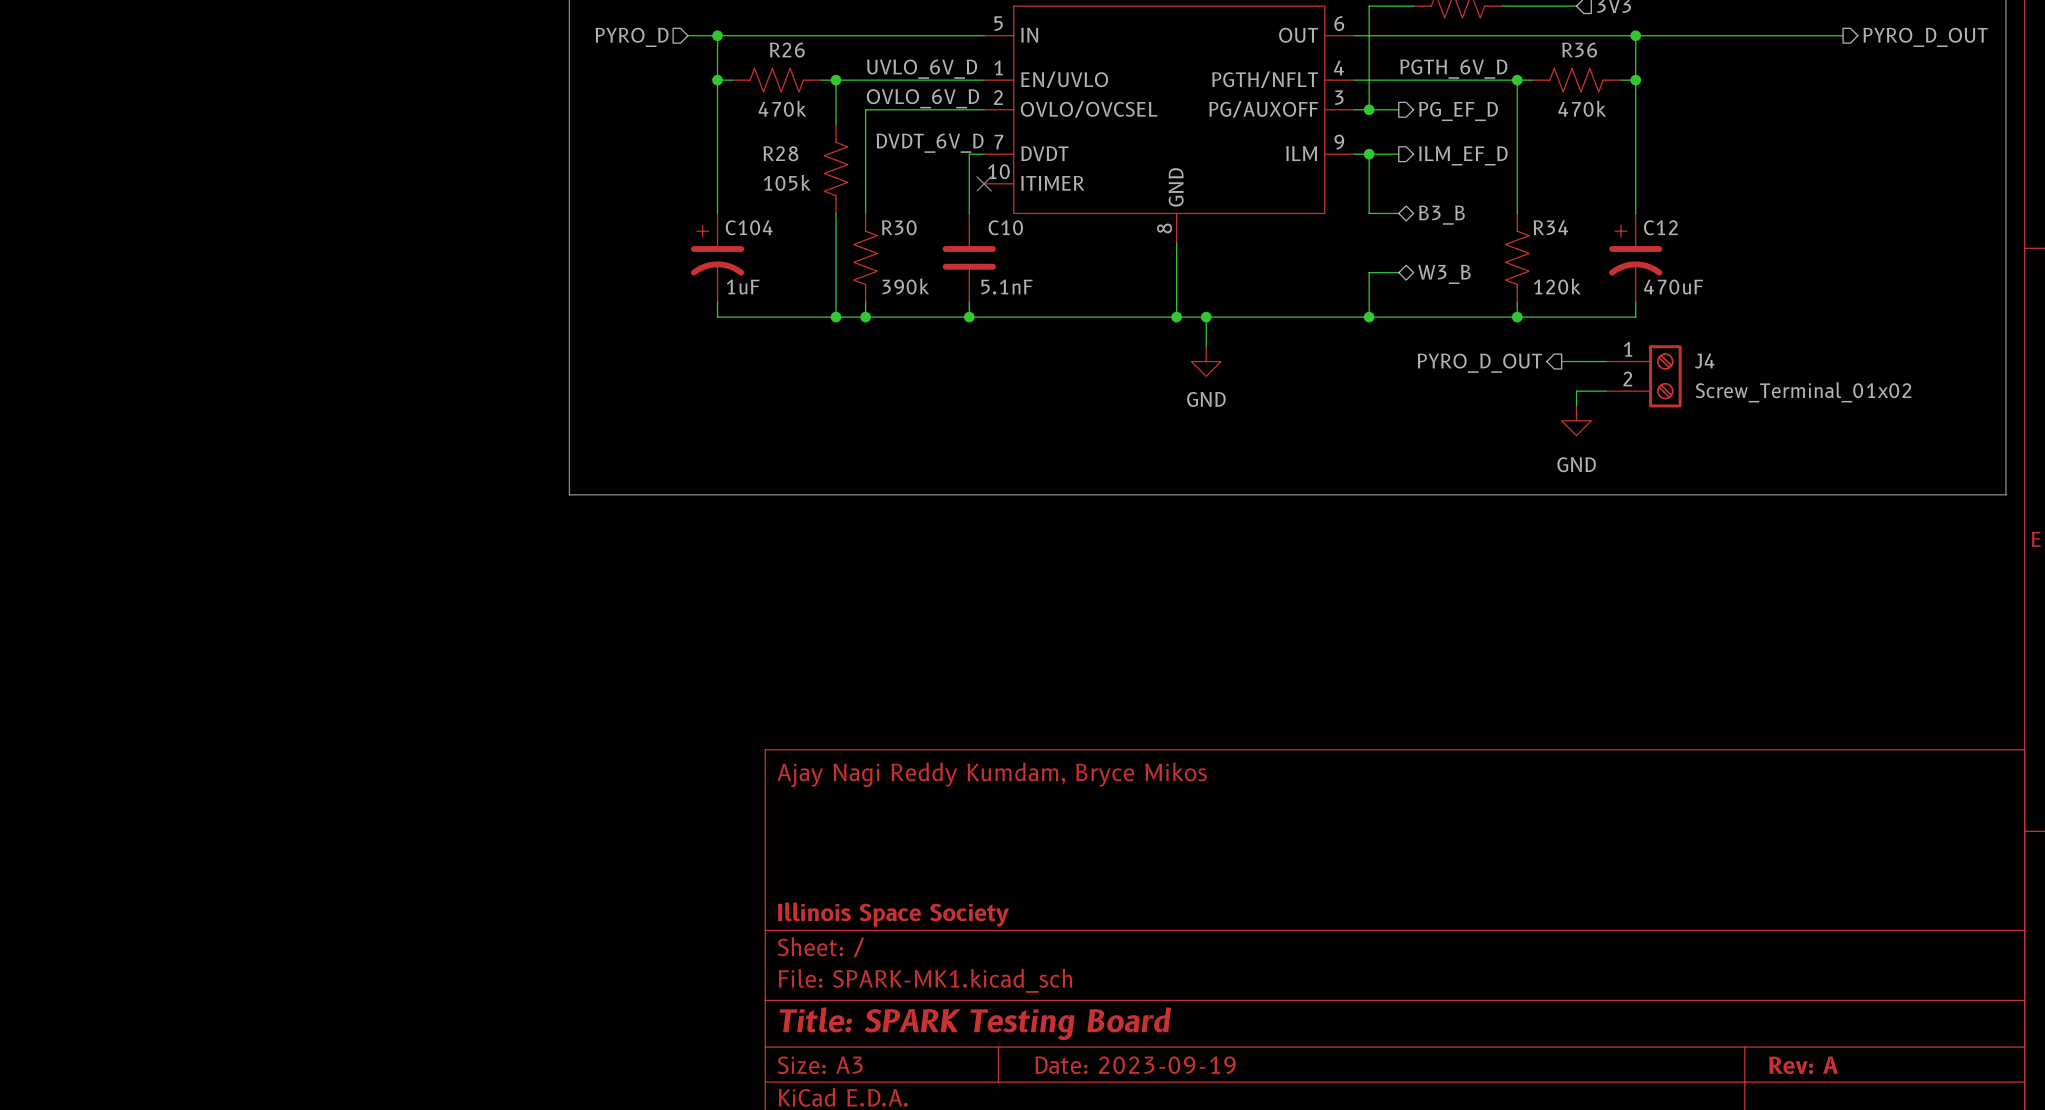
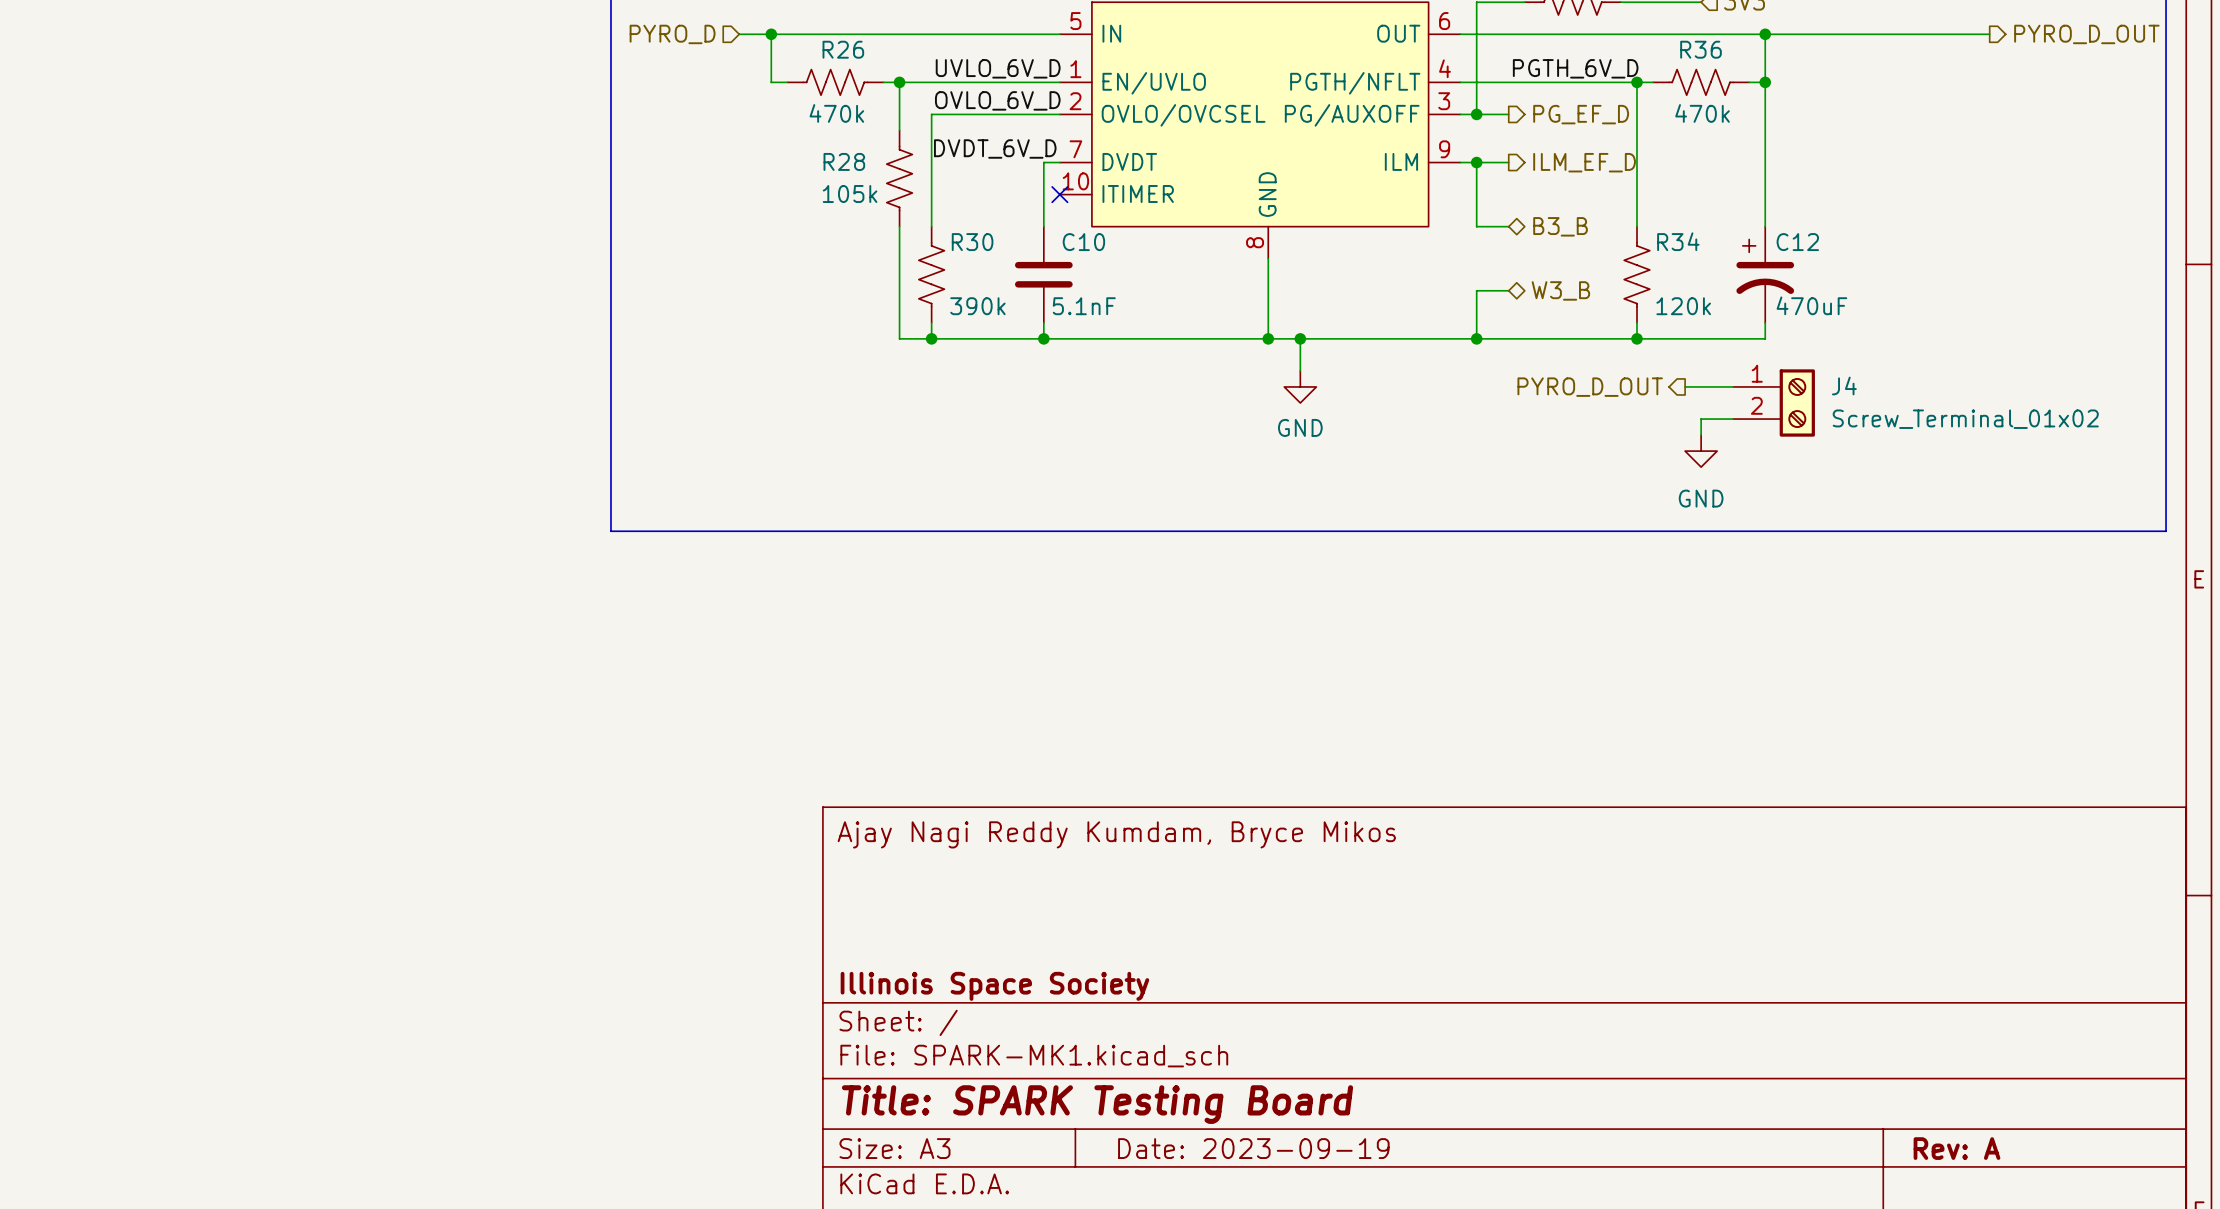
wire: (717, 80) (717, 213) -> none
junction: (717, 80) -> none
C104: 1uF (717, 257) -> none
wire: (717, 302) (717, 317) (836, 317) -> none
junction: (836, 317) -> none

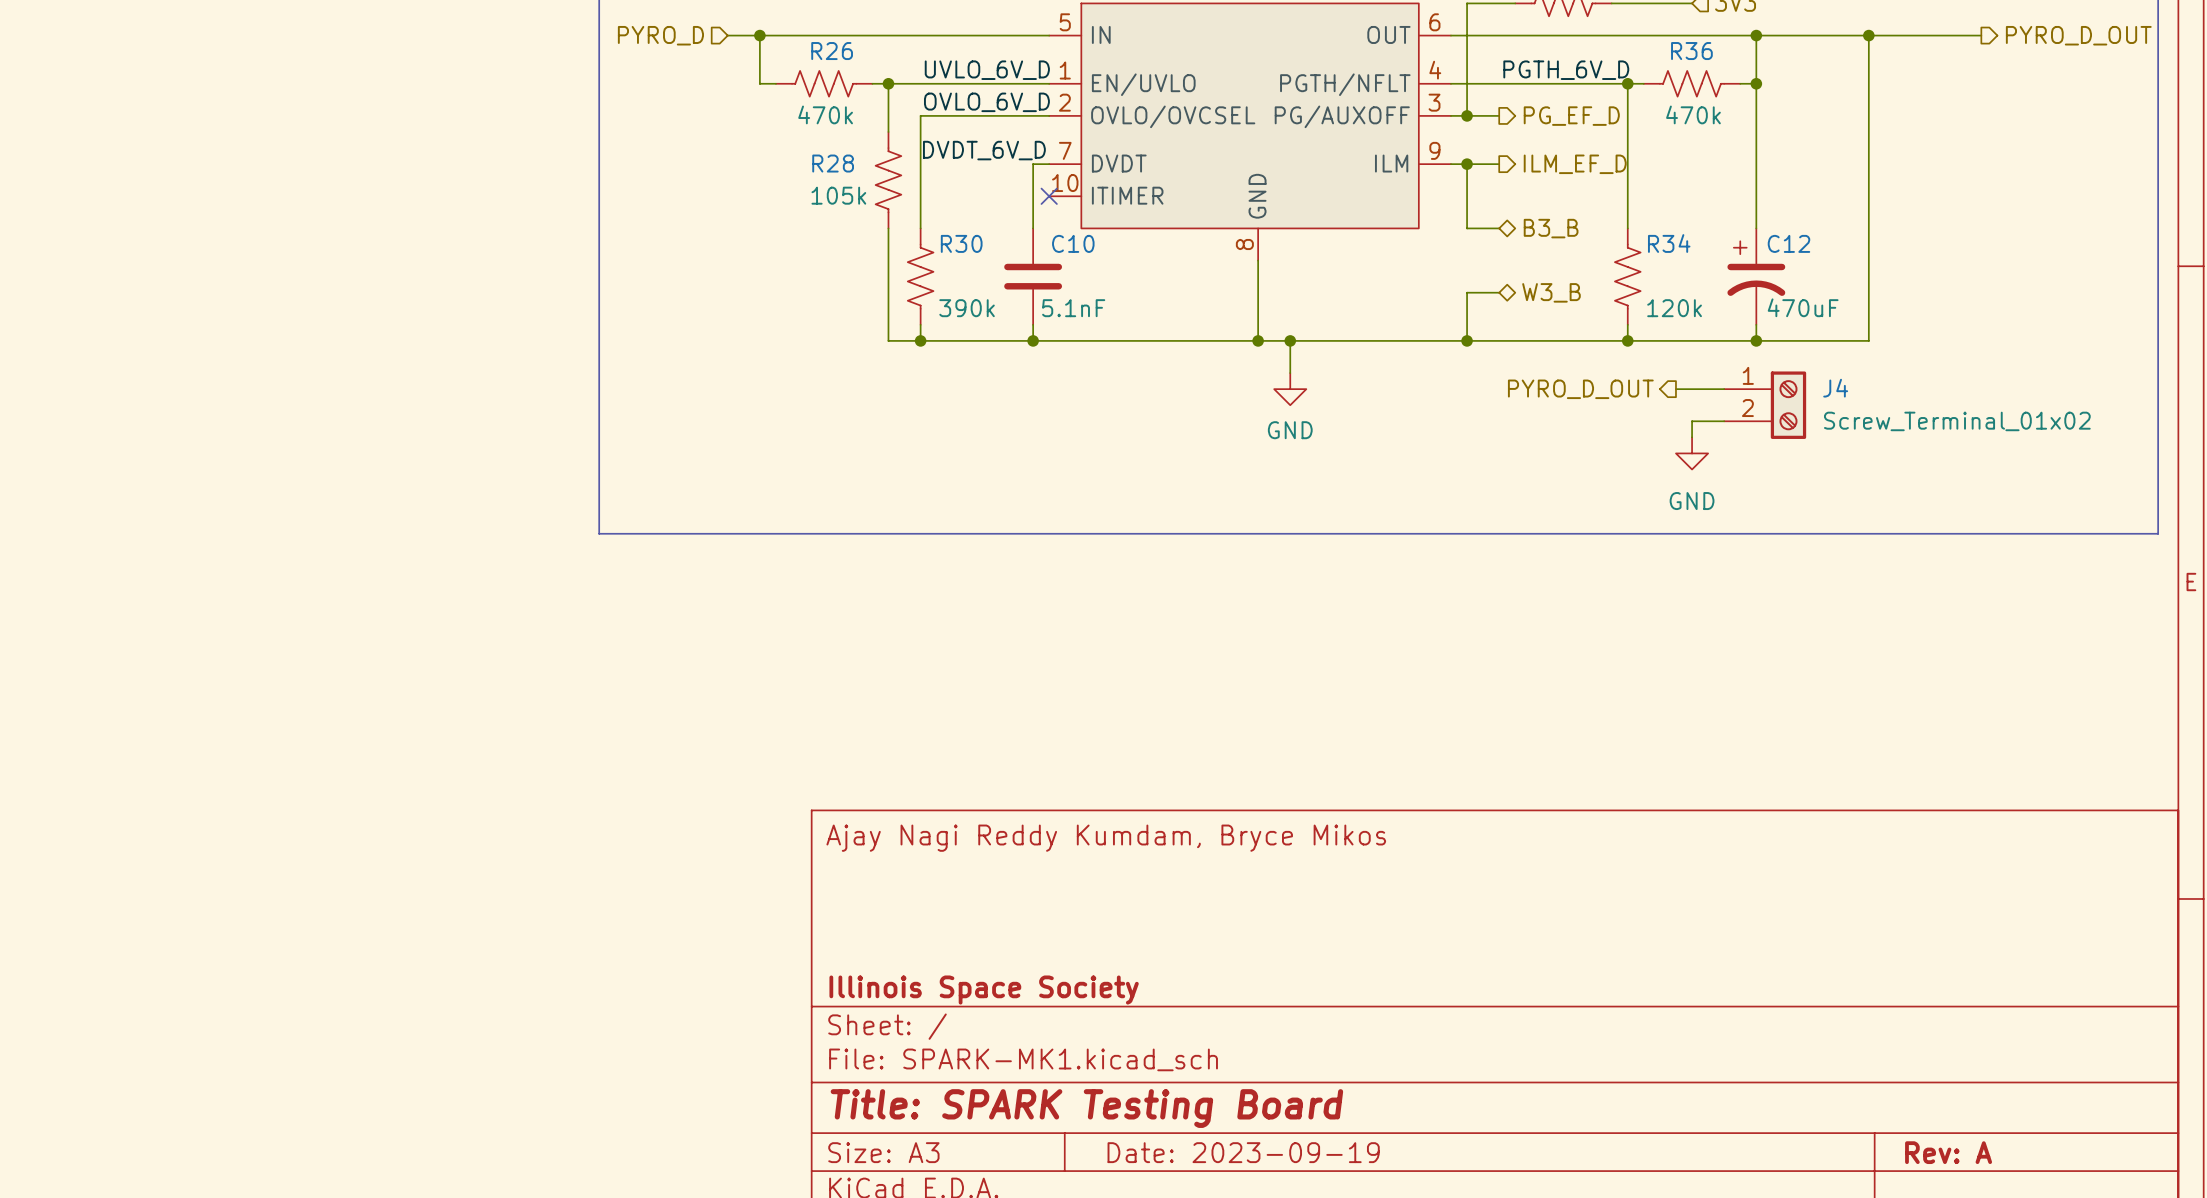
wire: none -> (1868, 35) (1868, 340) (1756, 340)
junction: none -> (1868, 35)
junction: none -> (1756, 340)

